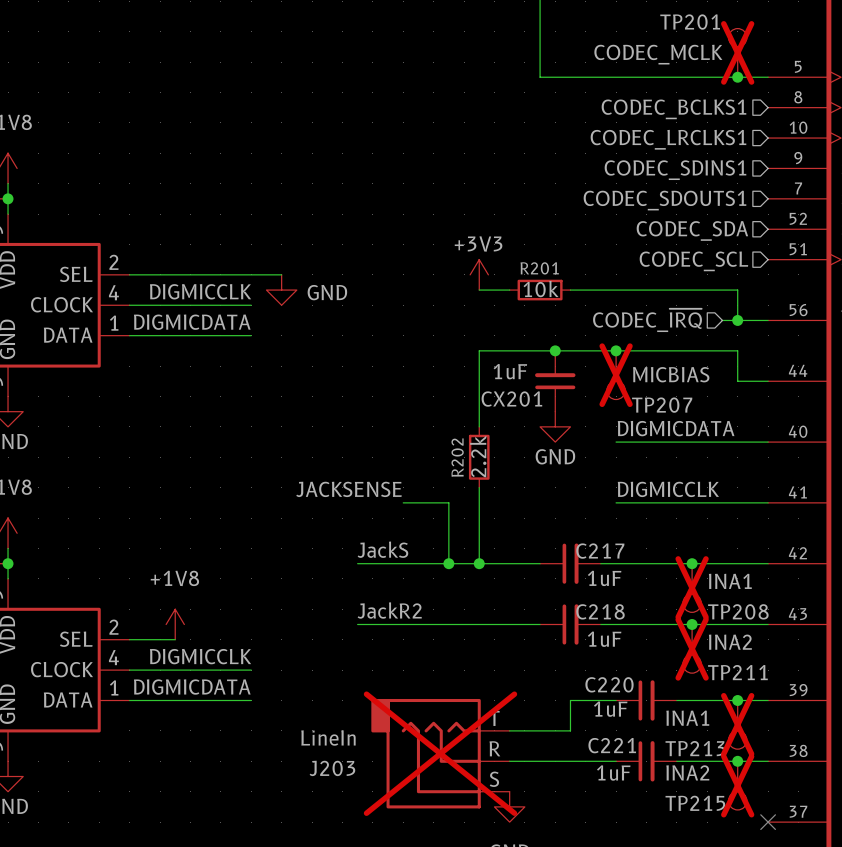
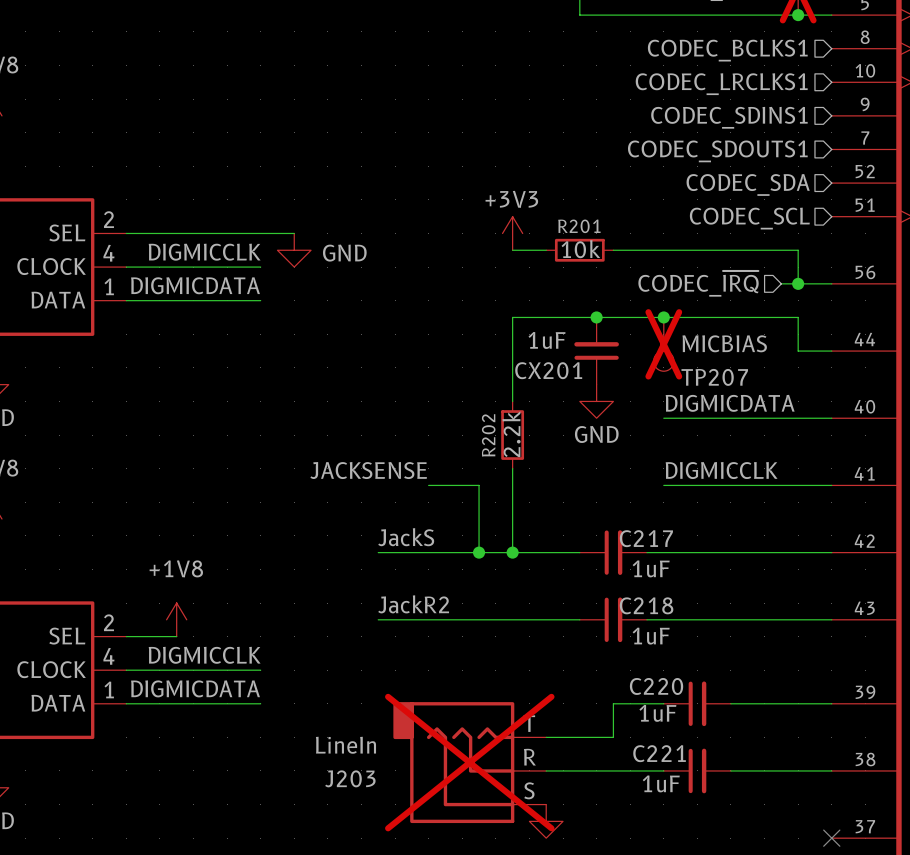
junction: (692, 563) -> none
TP208: INA1 (692, 588) -> none
junction: (692, 624) -> none
TP211: INA2 (692, 648) -> none
junction: (737, 700) -> none
TP213: INA1 (737, 724) -> none
junction: (737, 761) -> none
TP215: INA2 (737, 785) -> none

